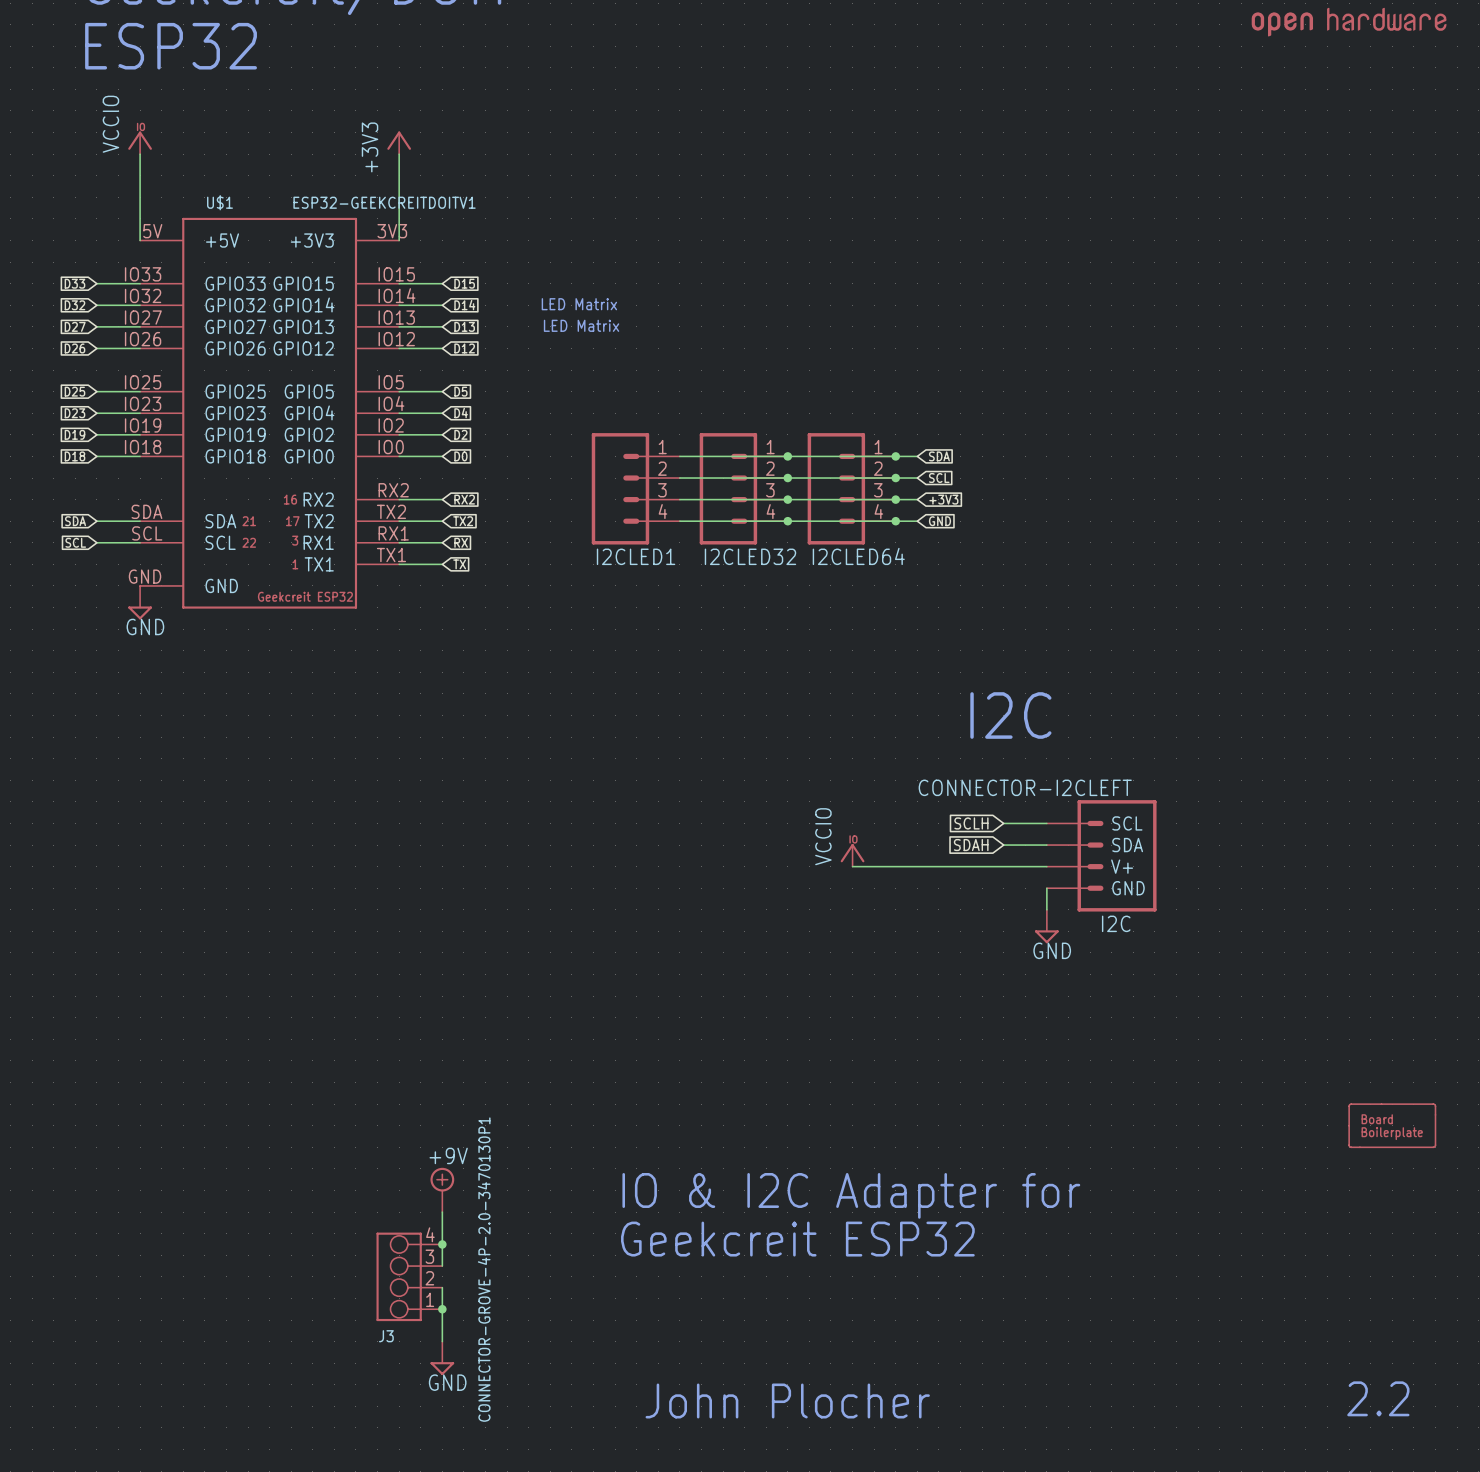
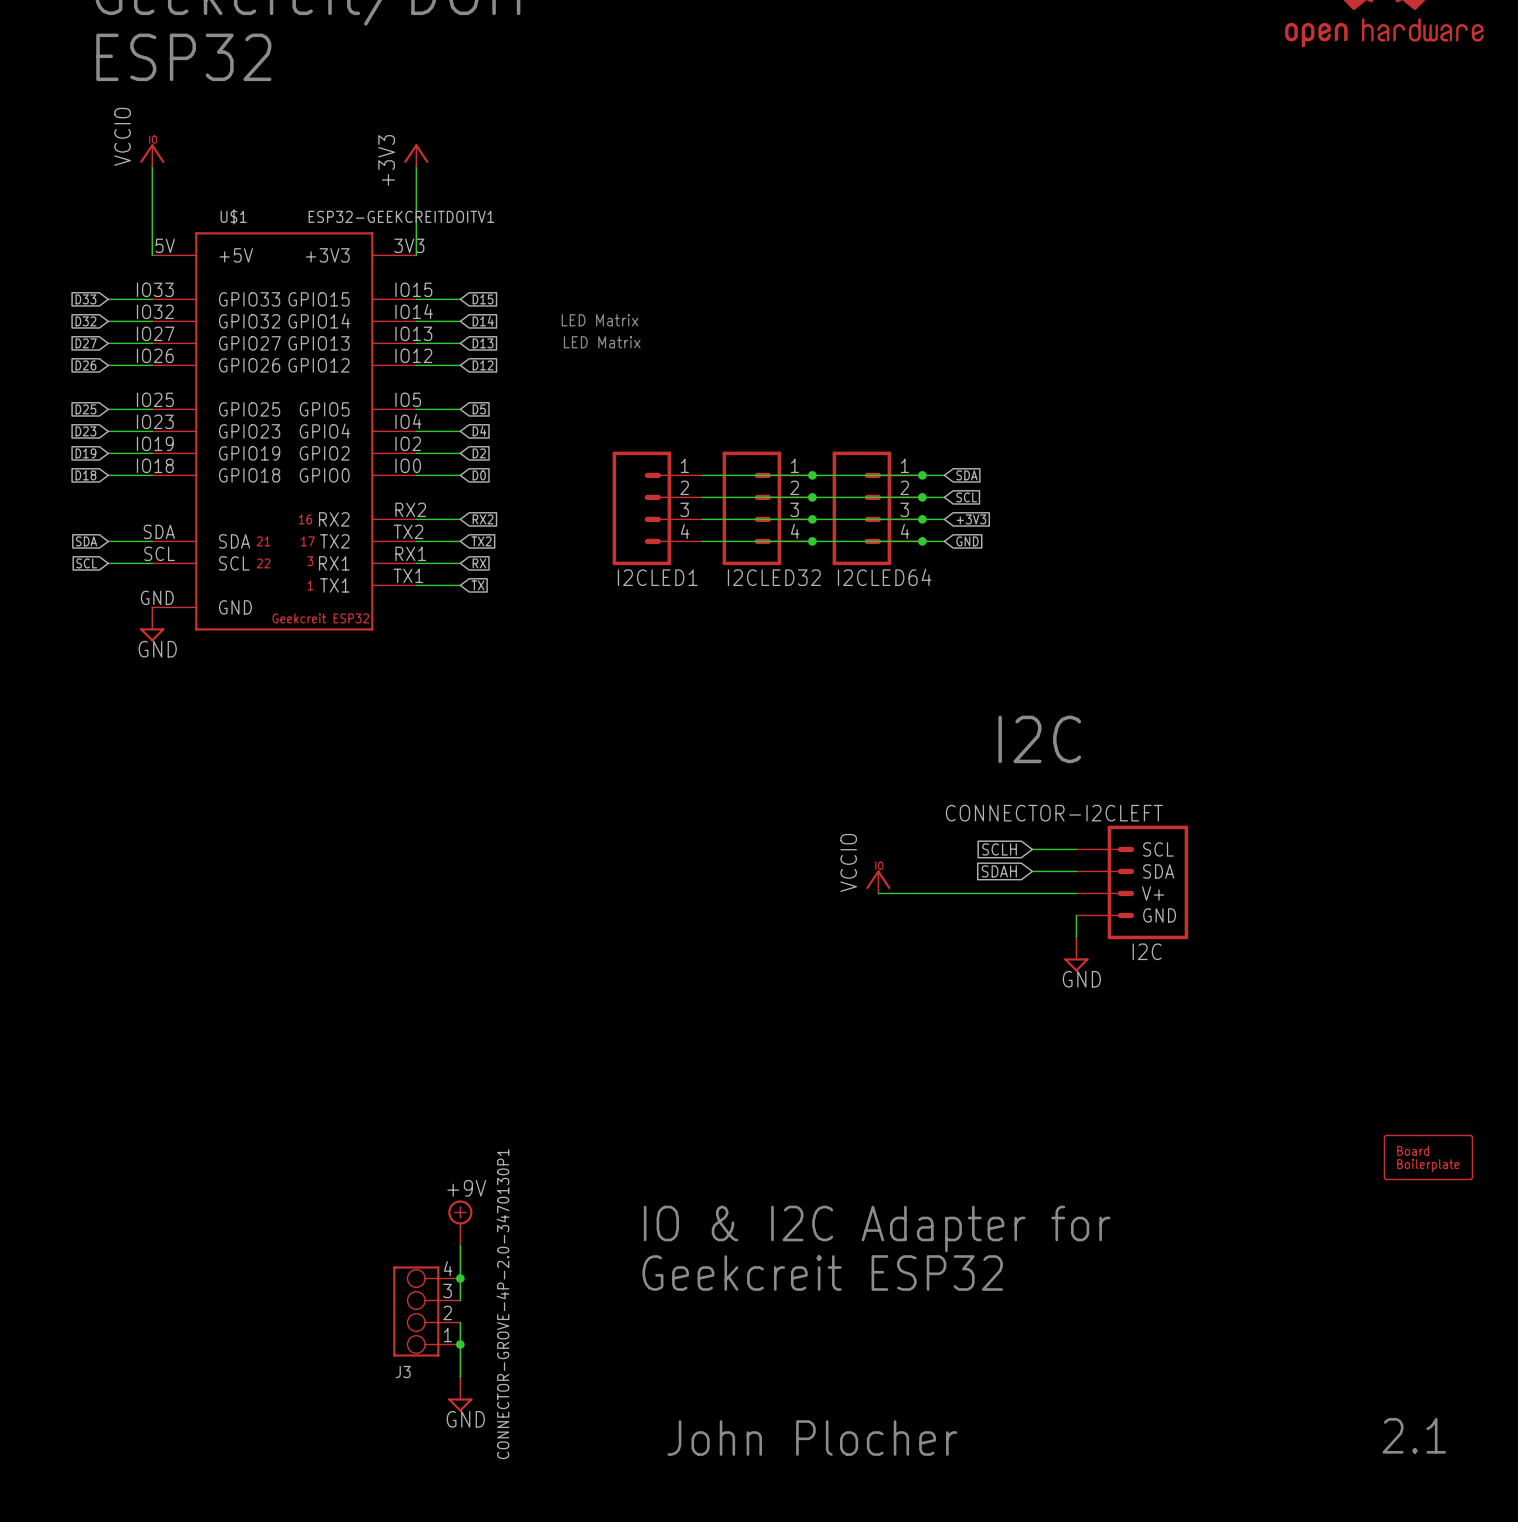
text: 2.2 (1378, 1398) -> 2.1 (1414, 1435)

